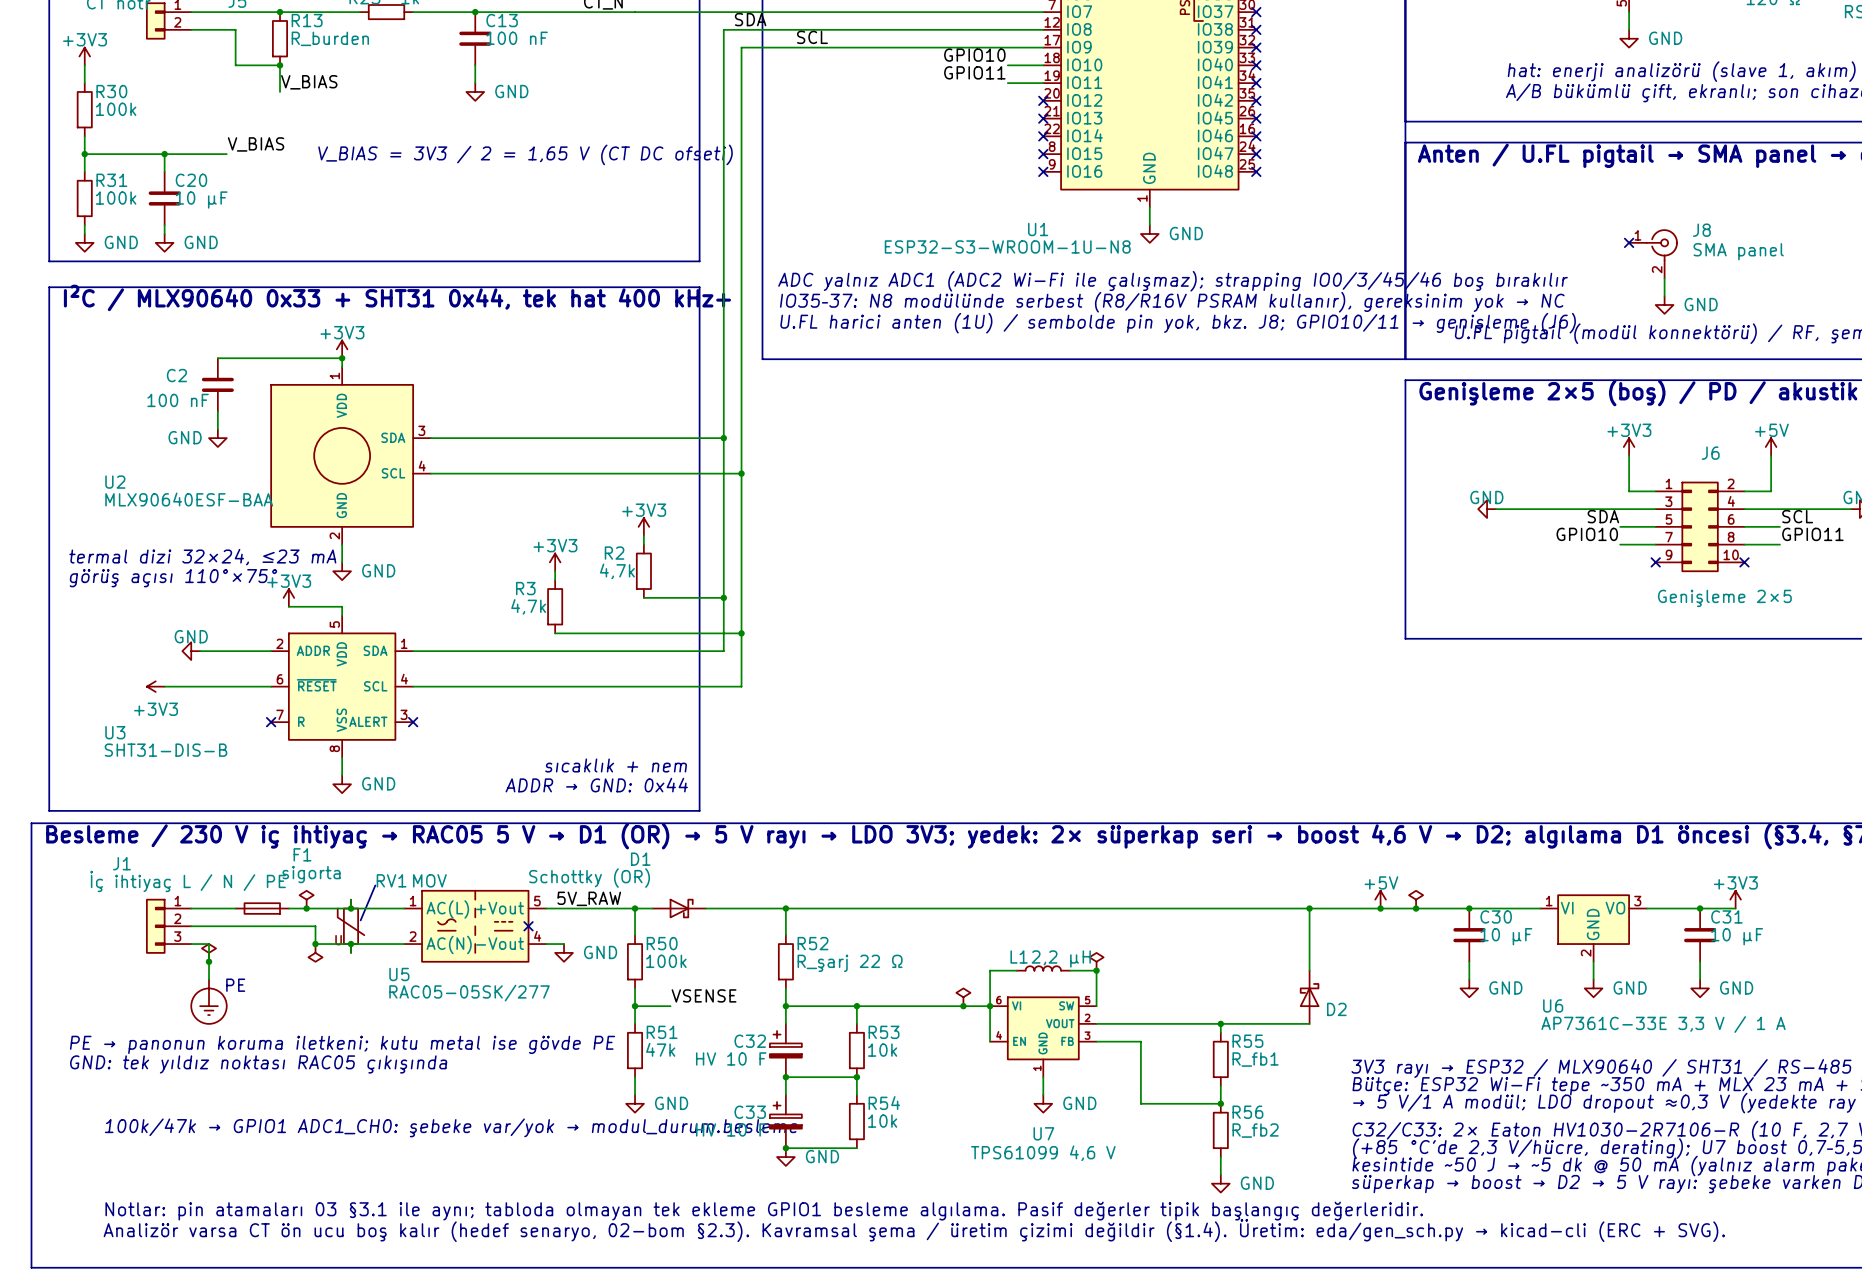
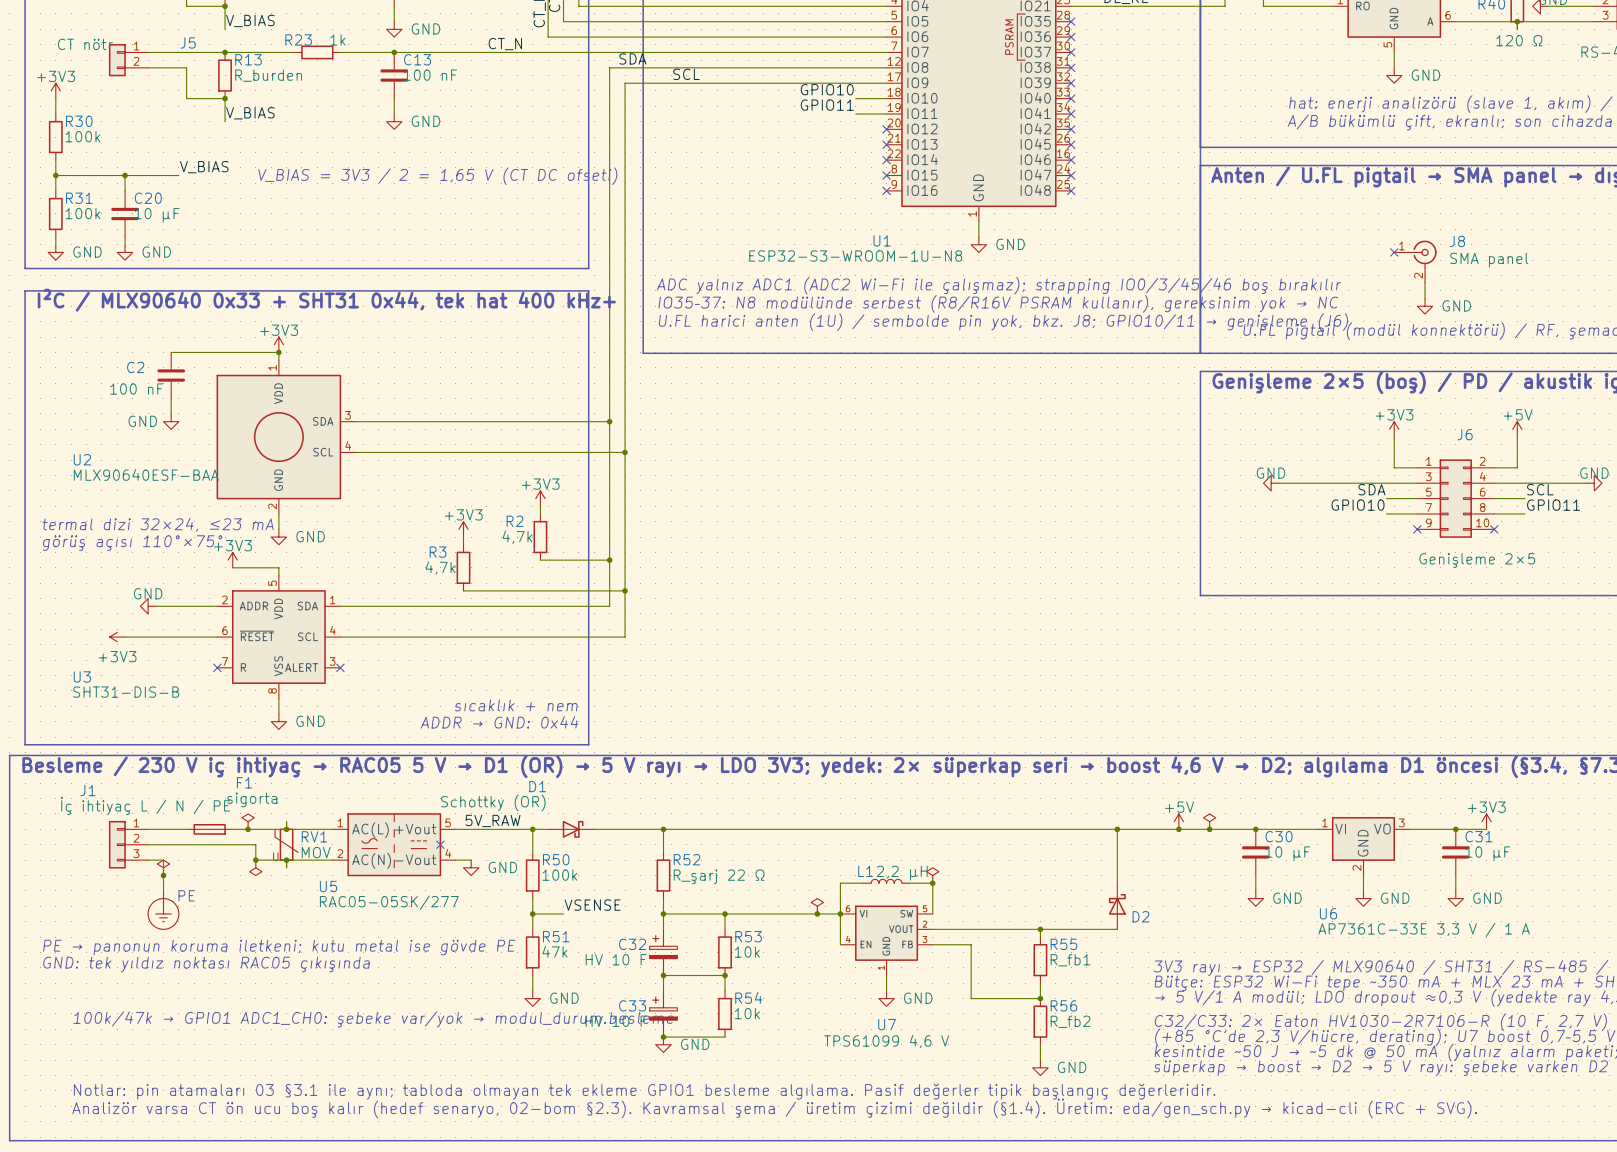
RV1 name position: RV1 (391, 880) -> RV1 (314, 836)
RV1 value position: MOV (429, 880) -> MOV (316, 852)
line: (375, 885) (360, 920) -> none

